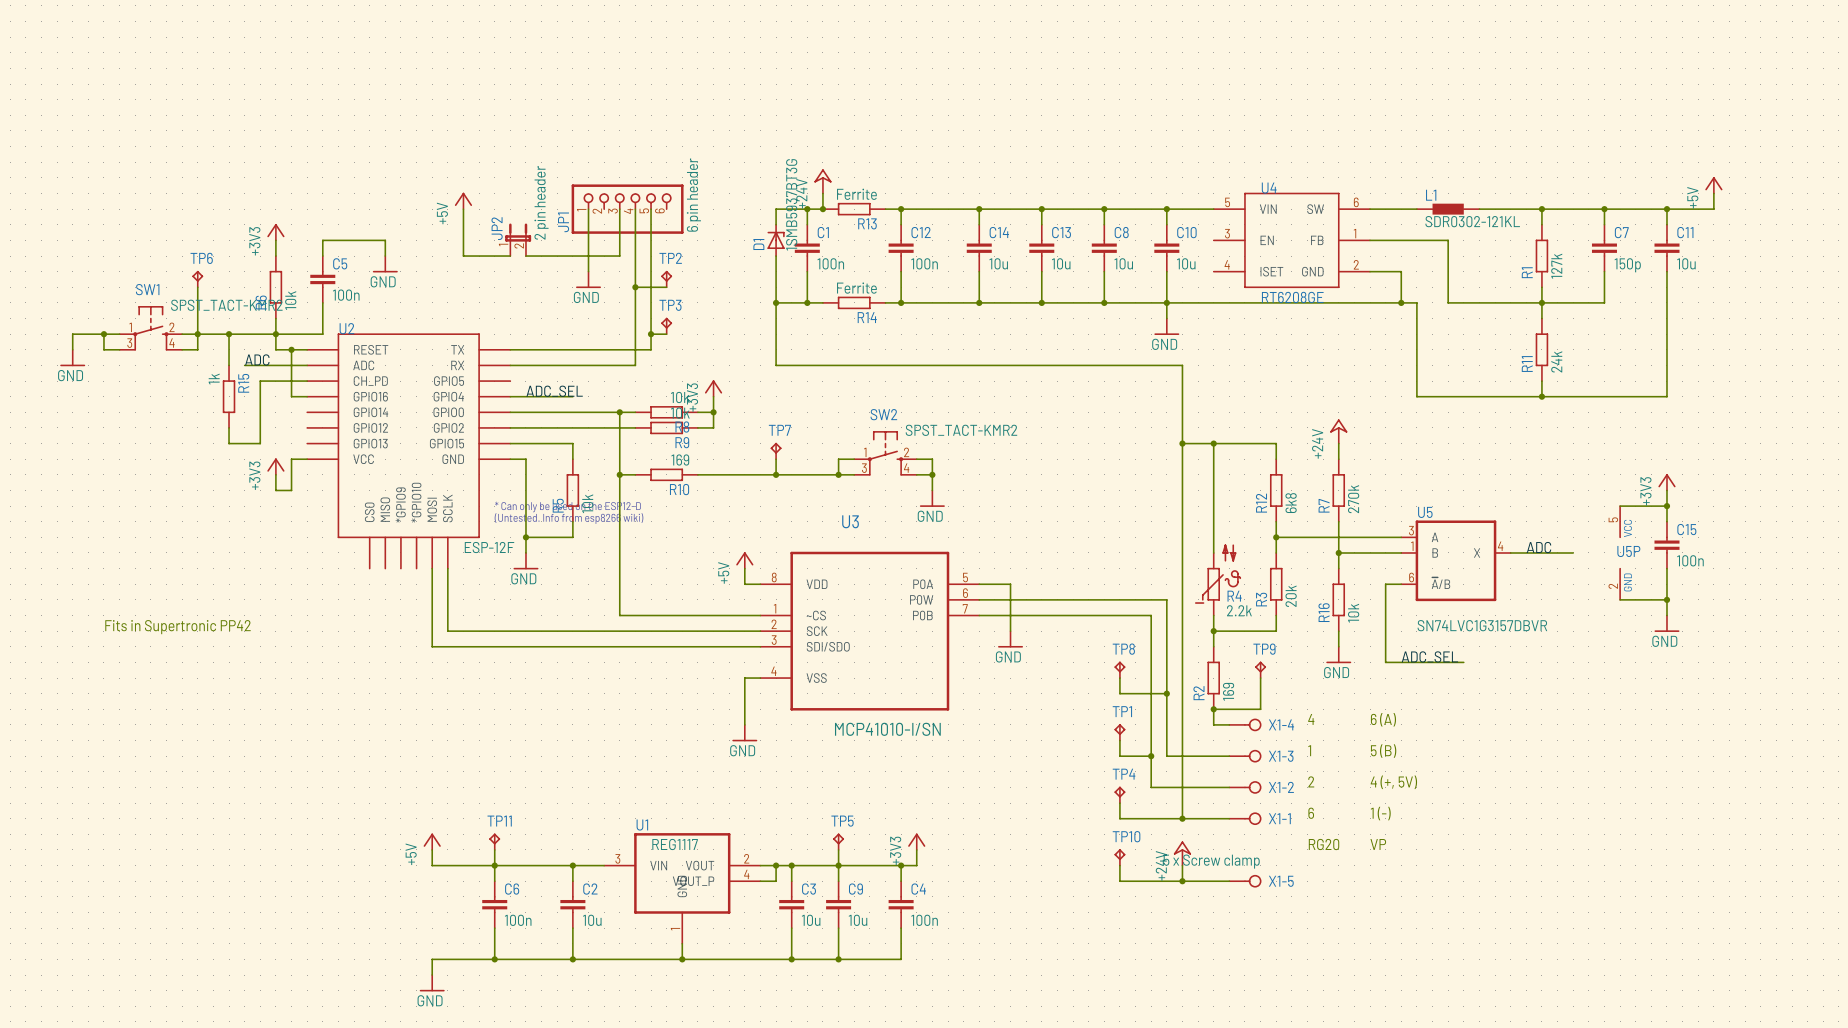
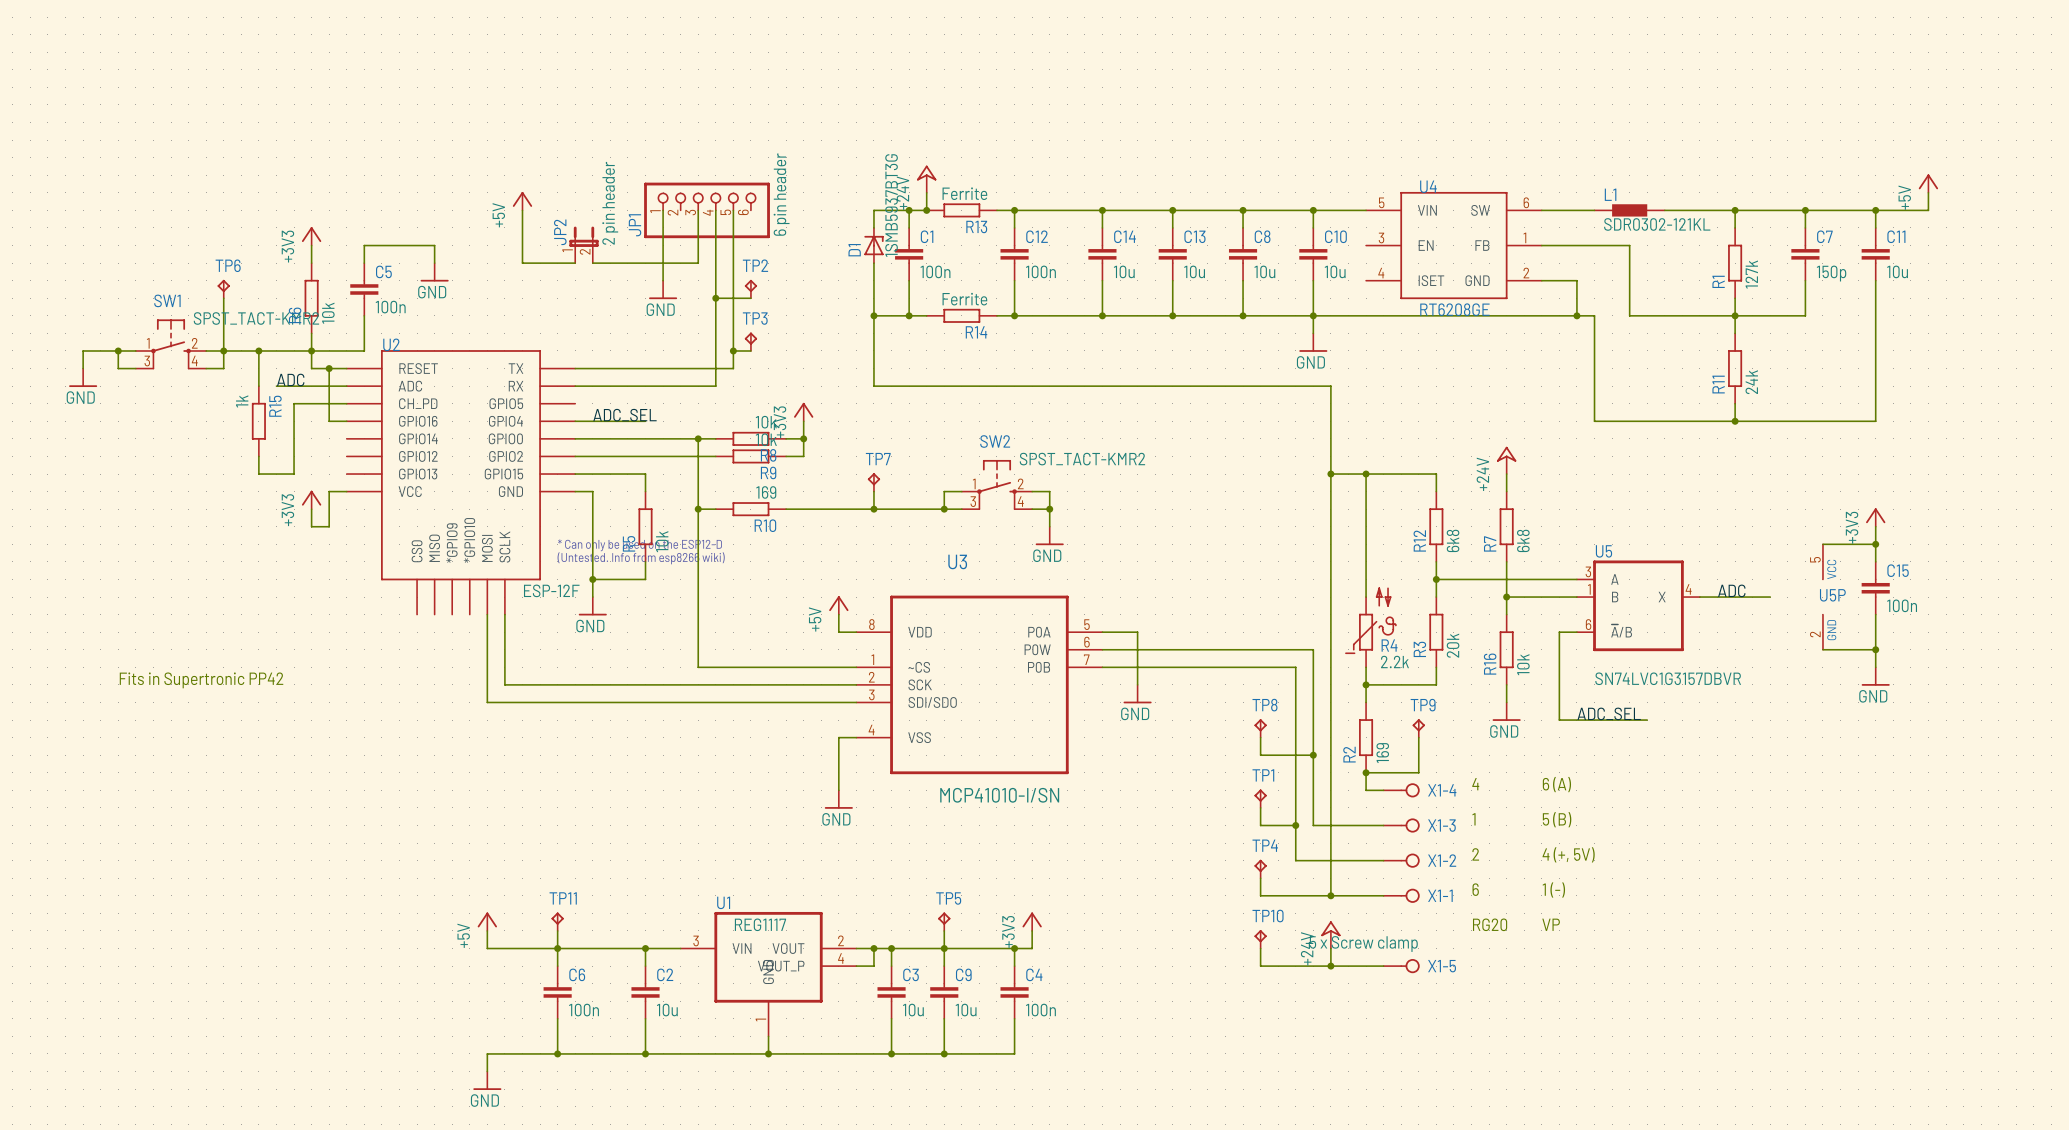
R7 value: 270k (1353, 499) -> 6k8 (1523, 540)

